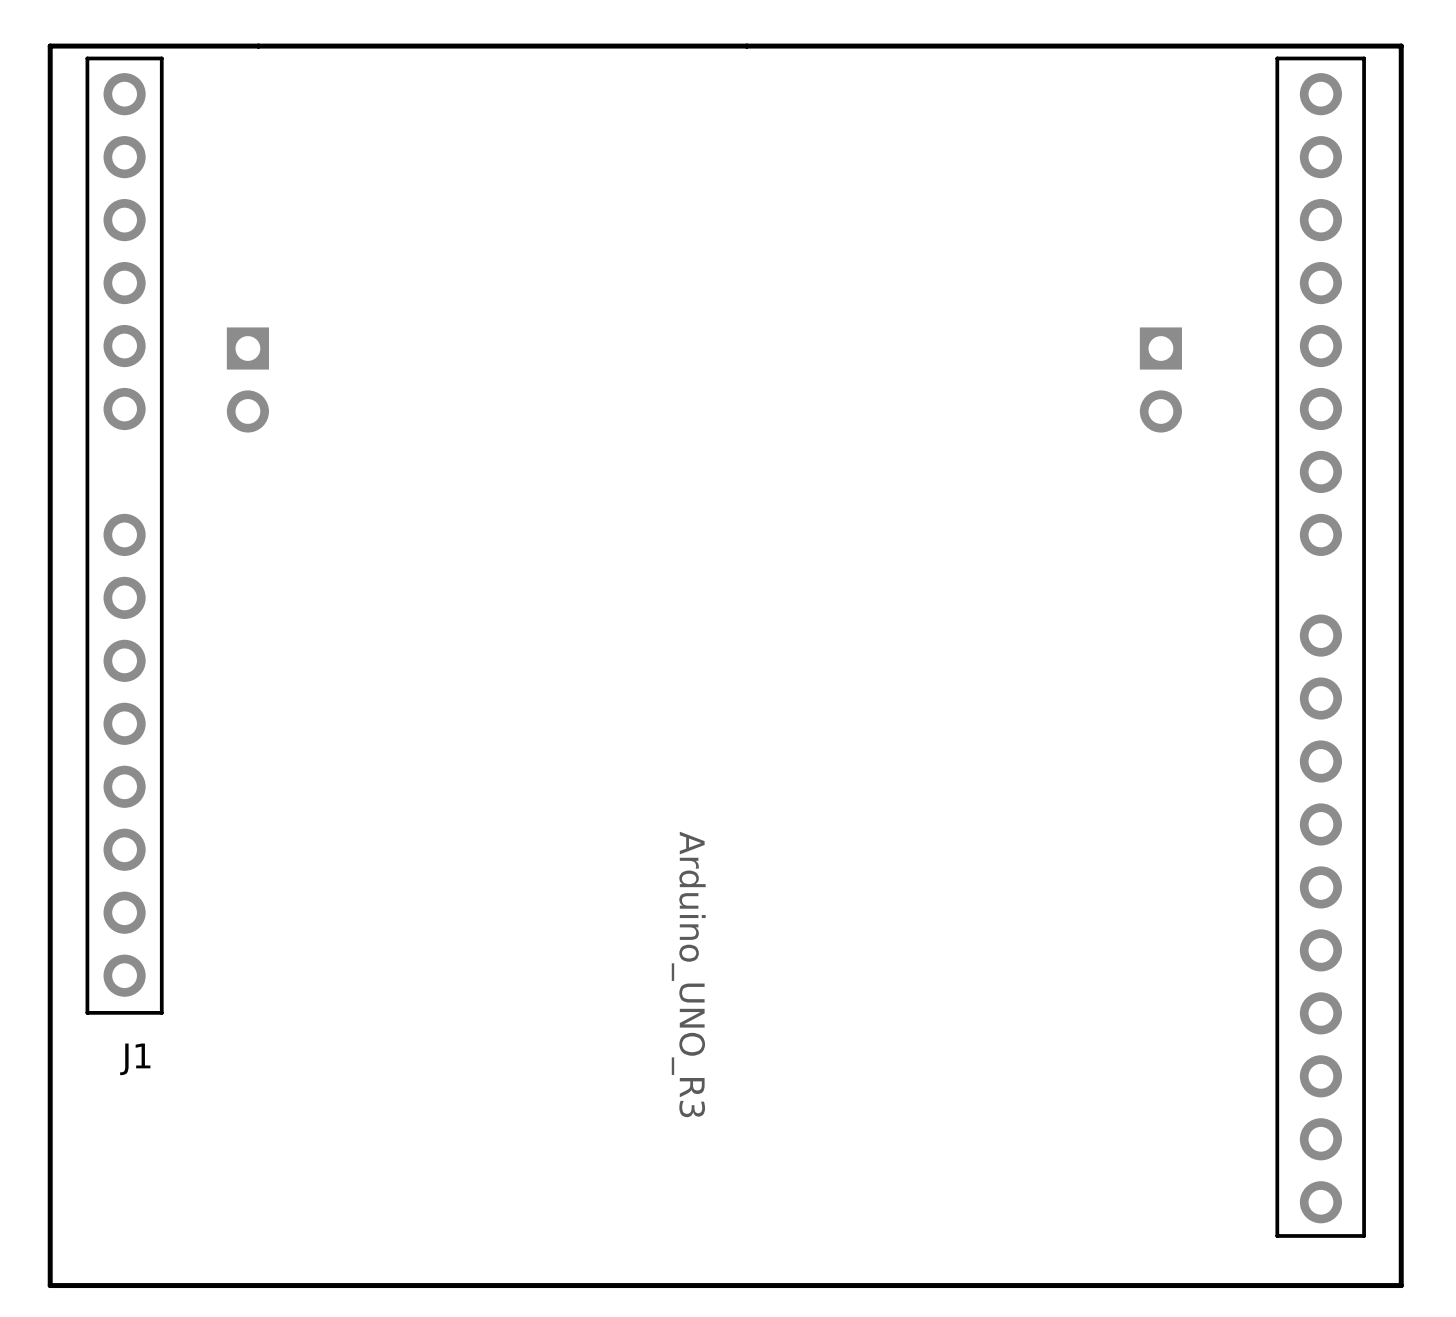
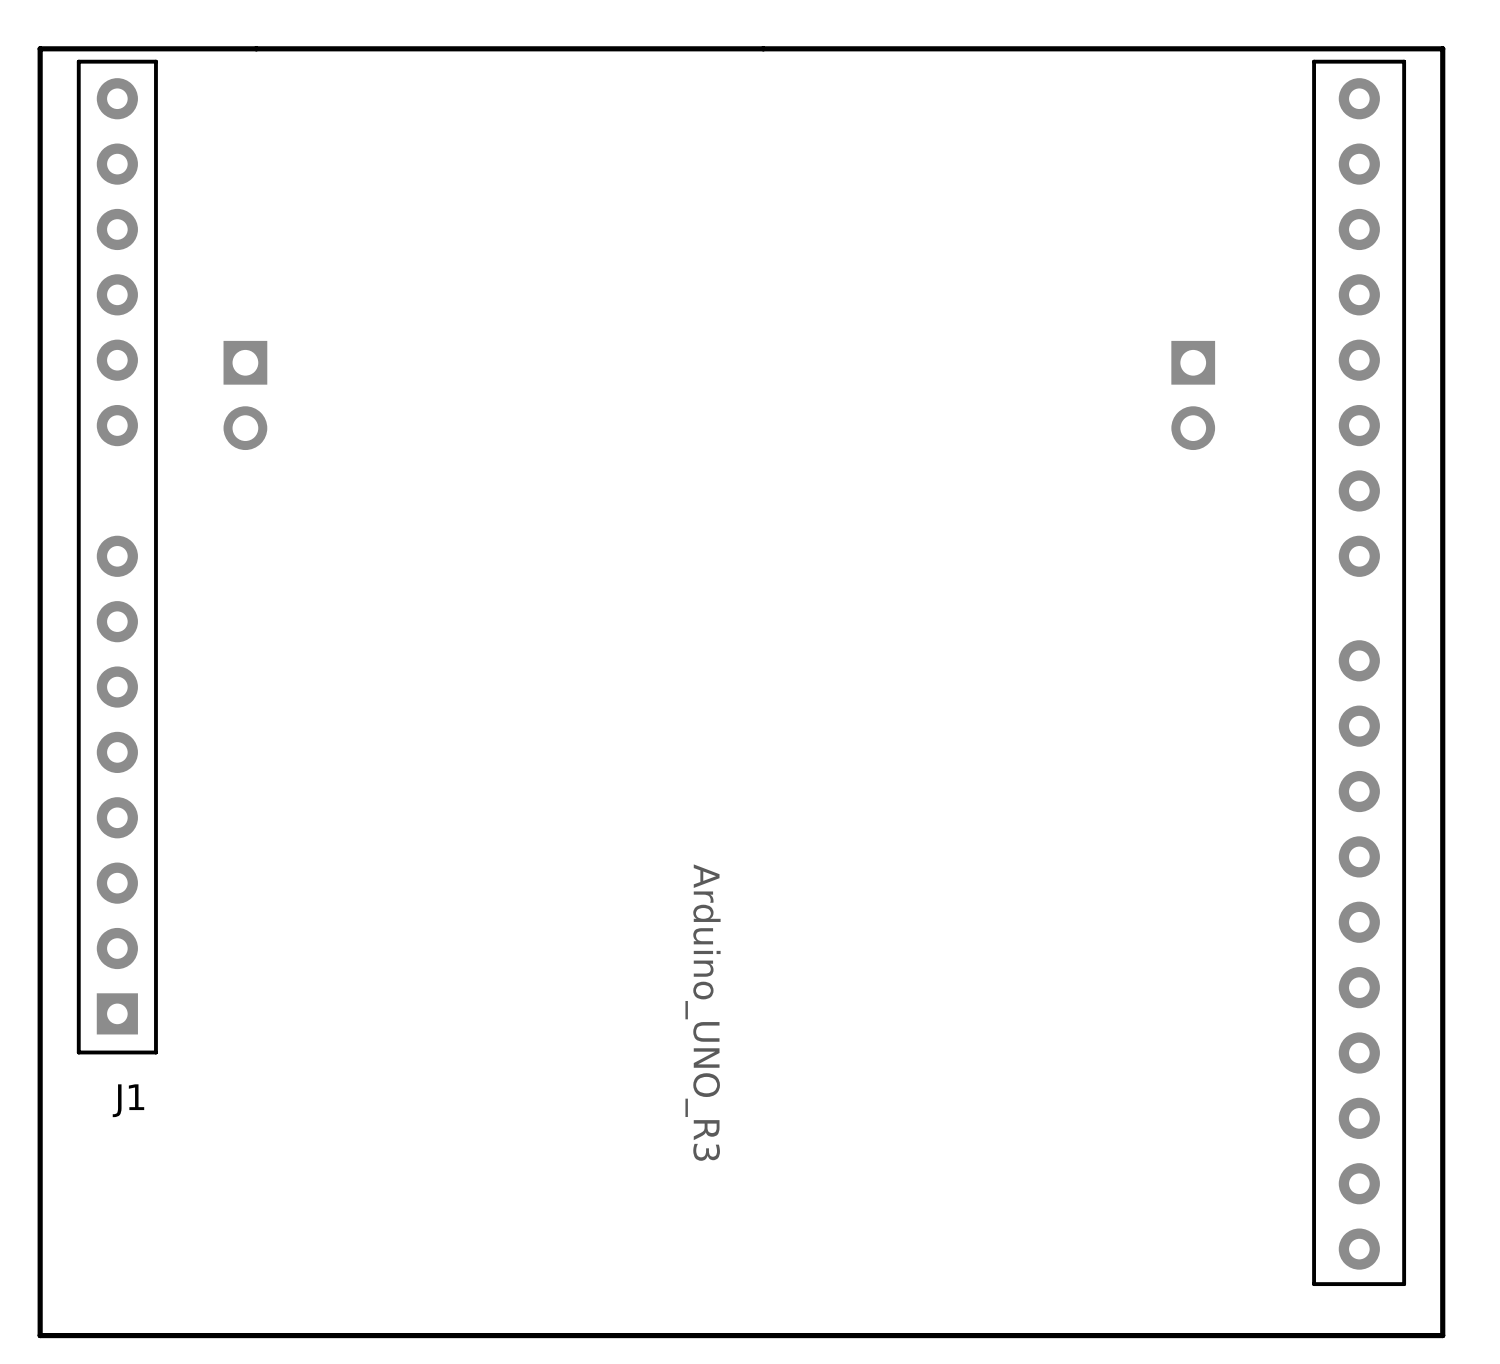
J1 footprint: [85, 56, 1366, 1238] -> [76, 59, 1407, 1287]

